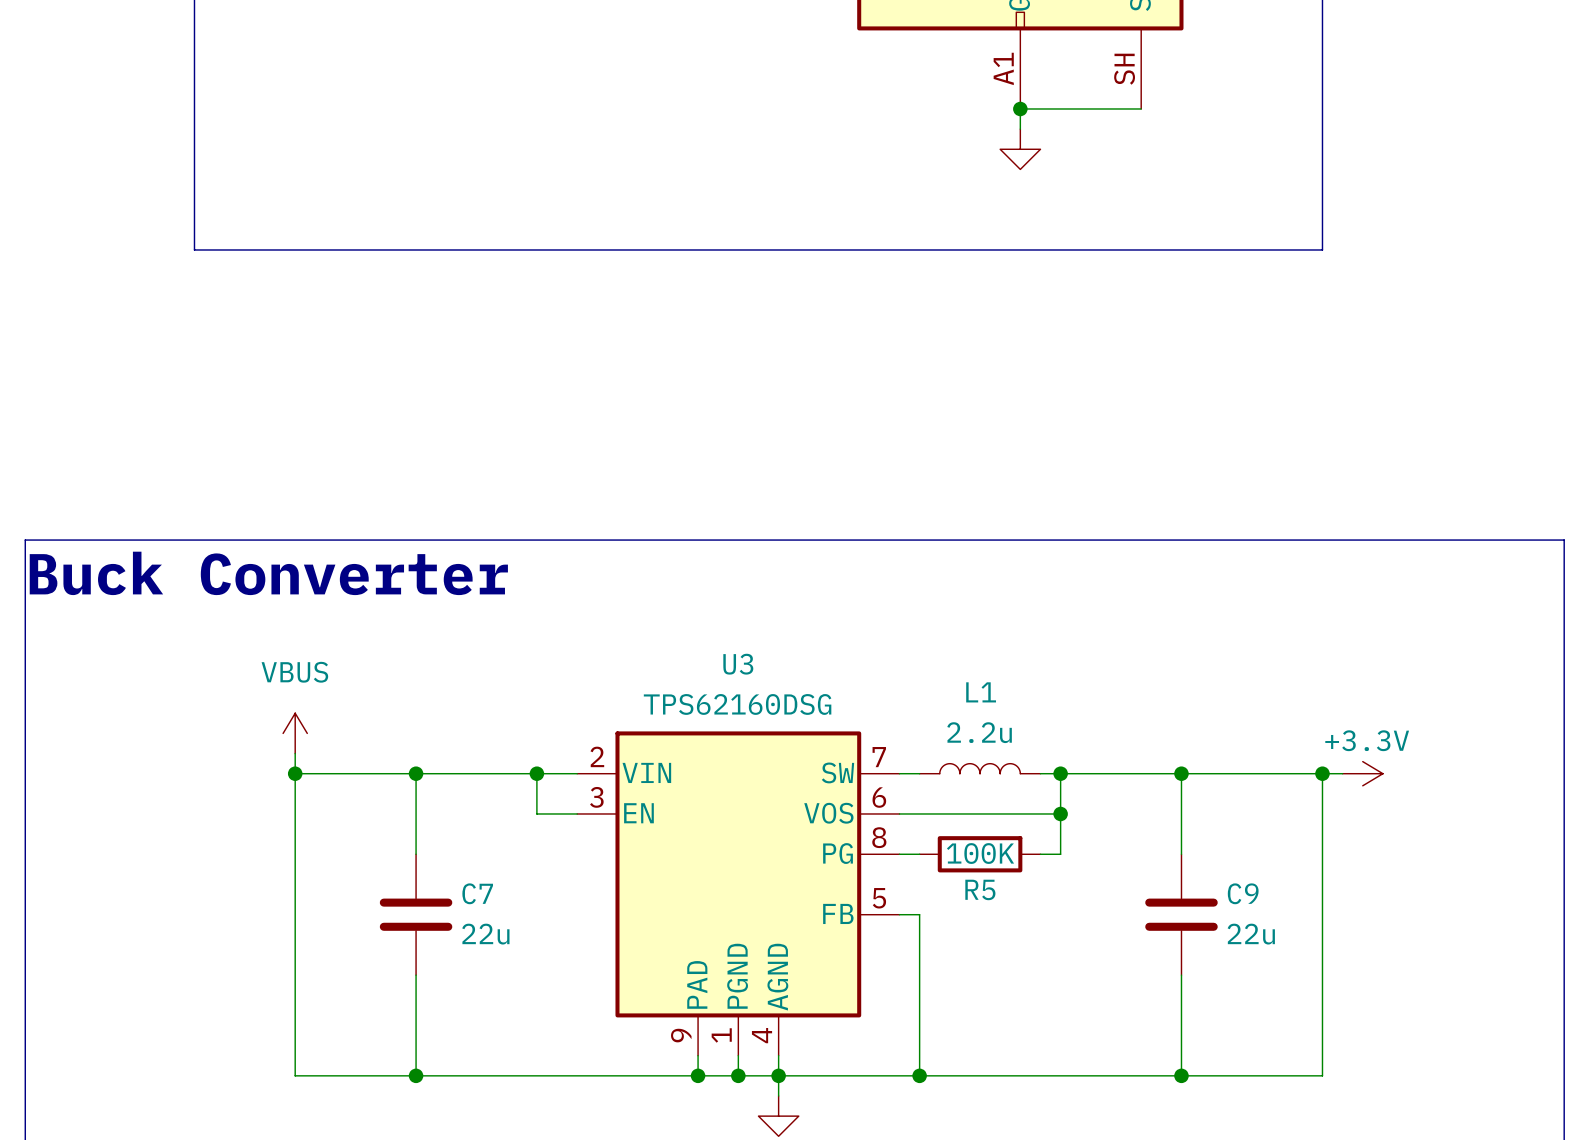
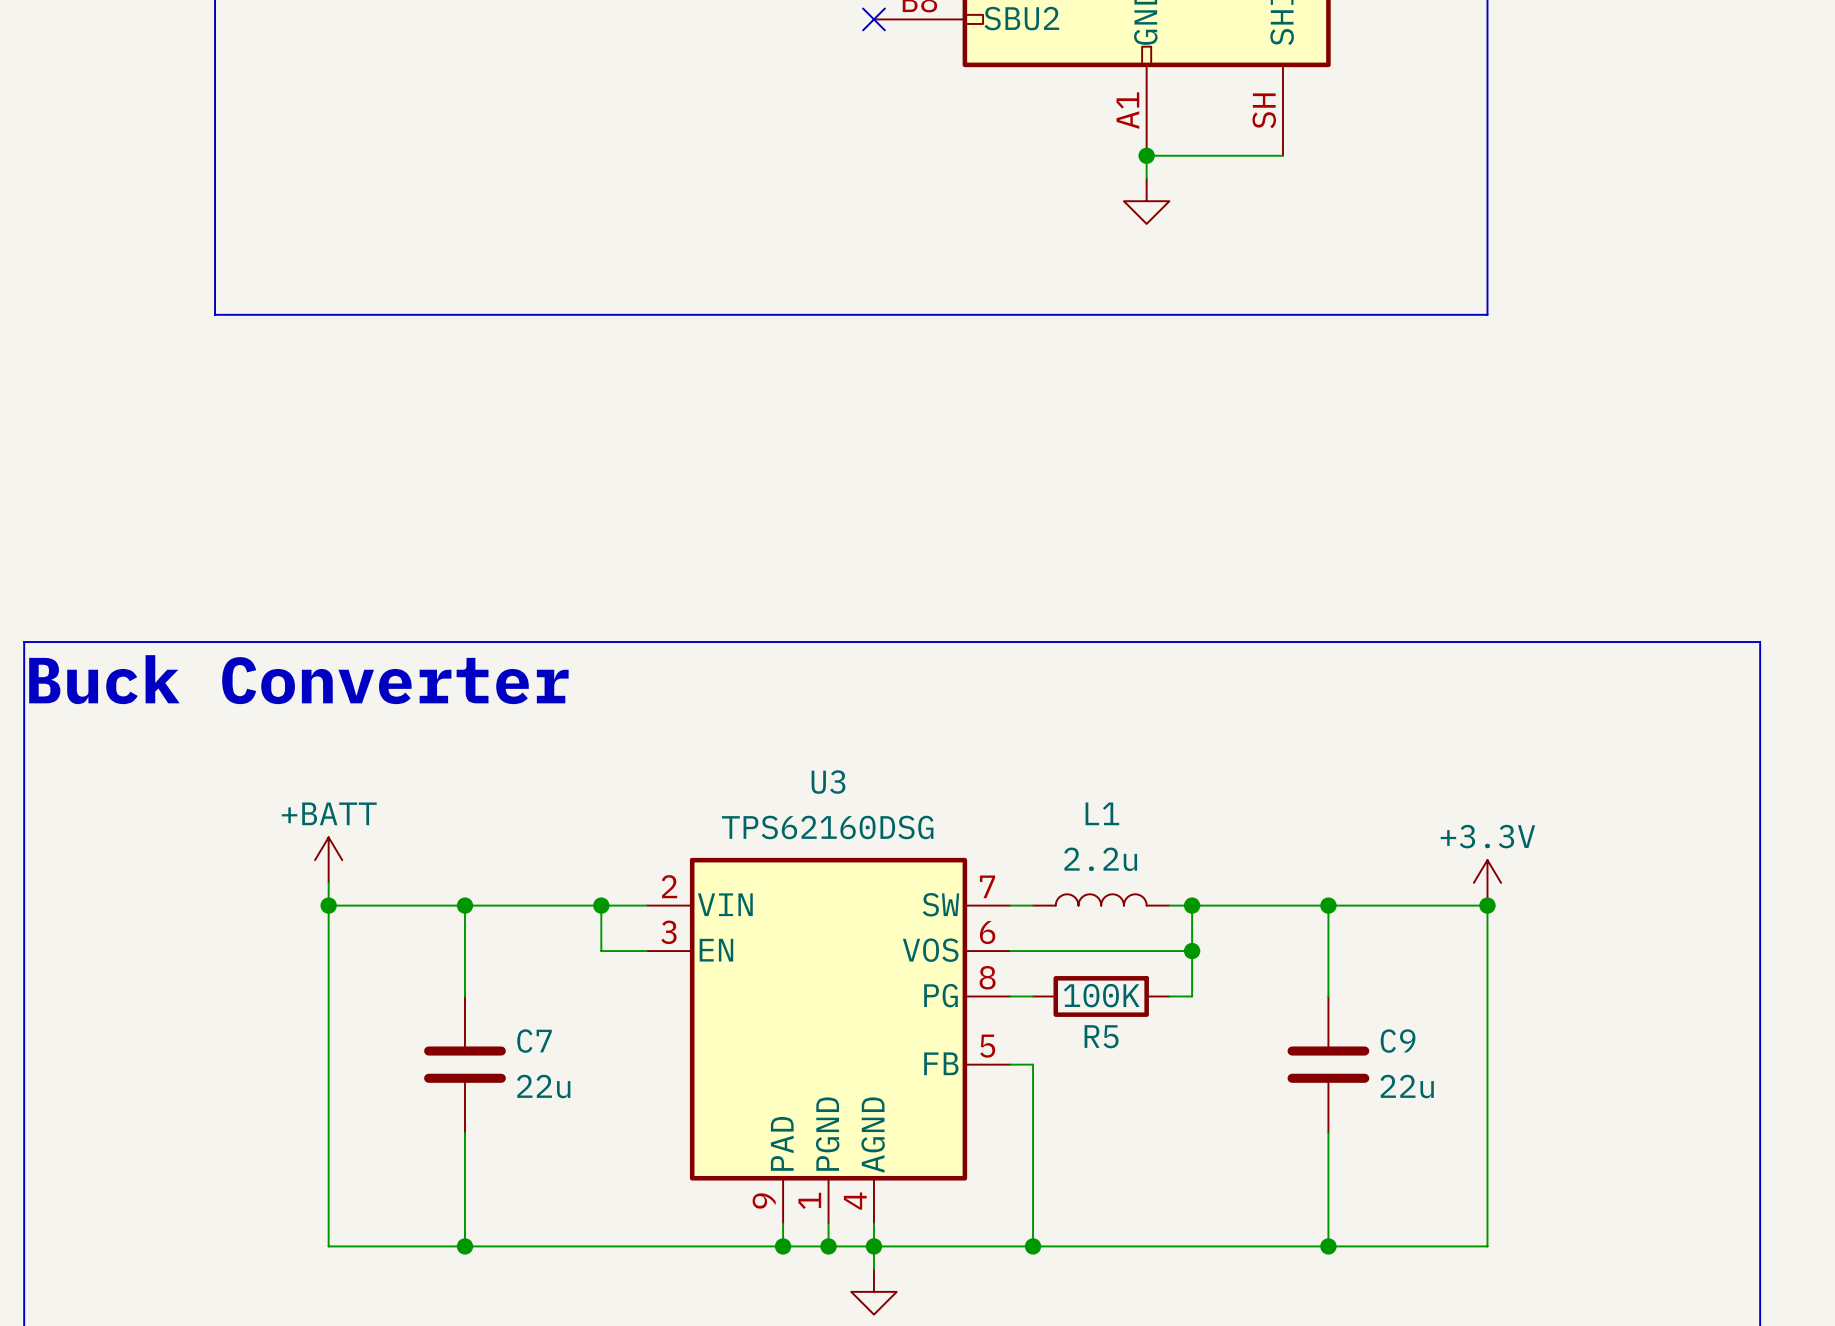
power symbol: VBUS (295, 733) -> +BATT (328, 860)
wire: (1322, 773) (1342, 773) -> none
power symbol rotation: 0° (1362, 773) -> 90° counterclockwise (1487, 882)
power symbol position: +3.3V (1362, 773) -> +3.3V (1487, 882)

